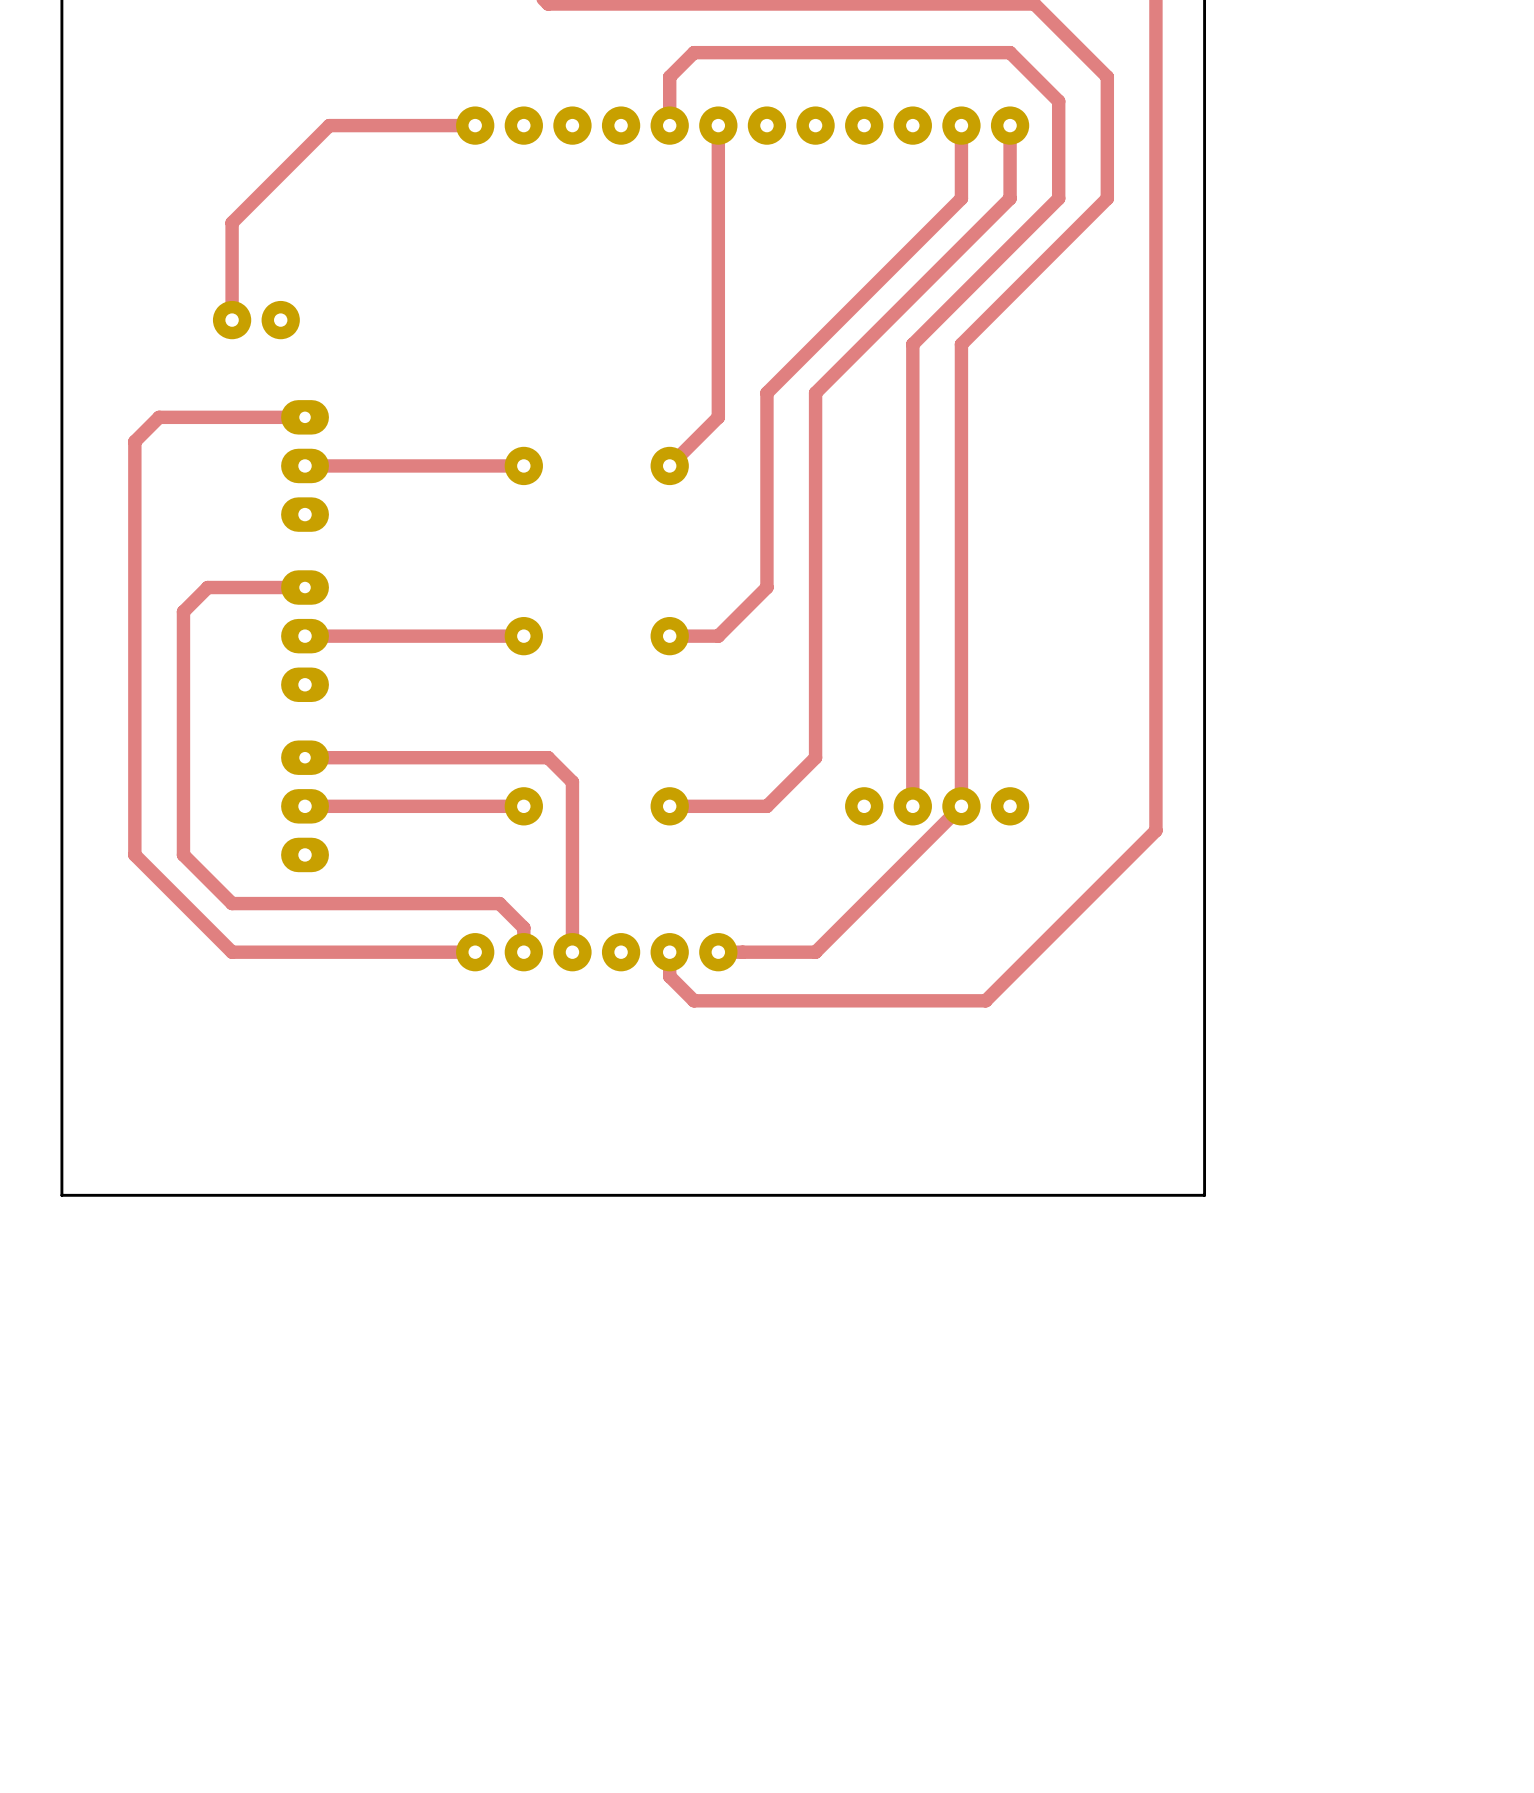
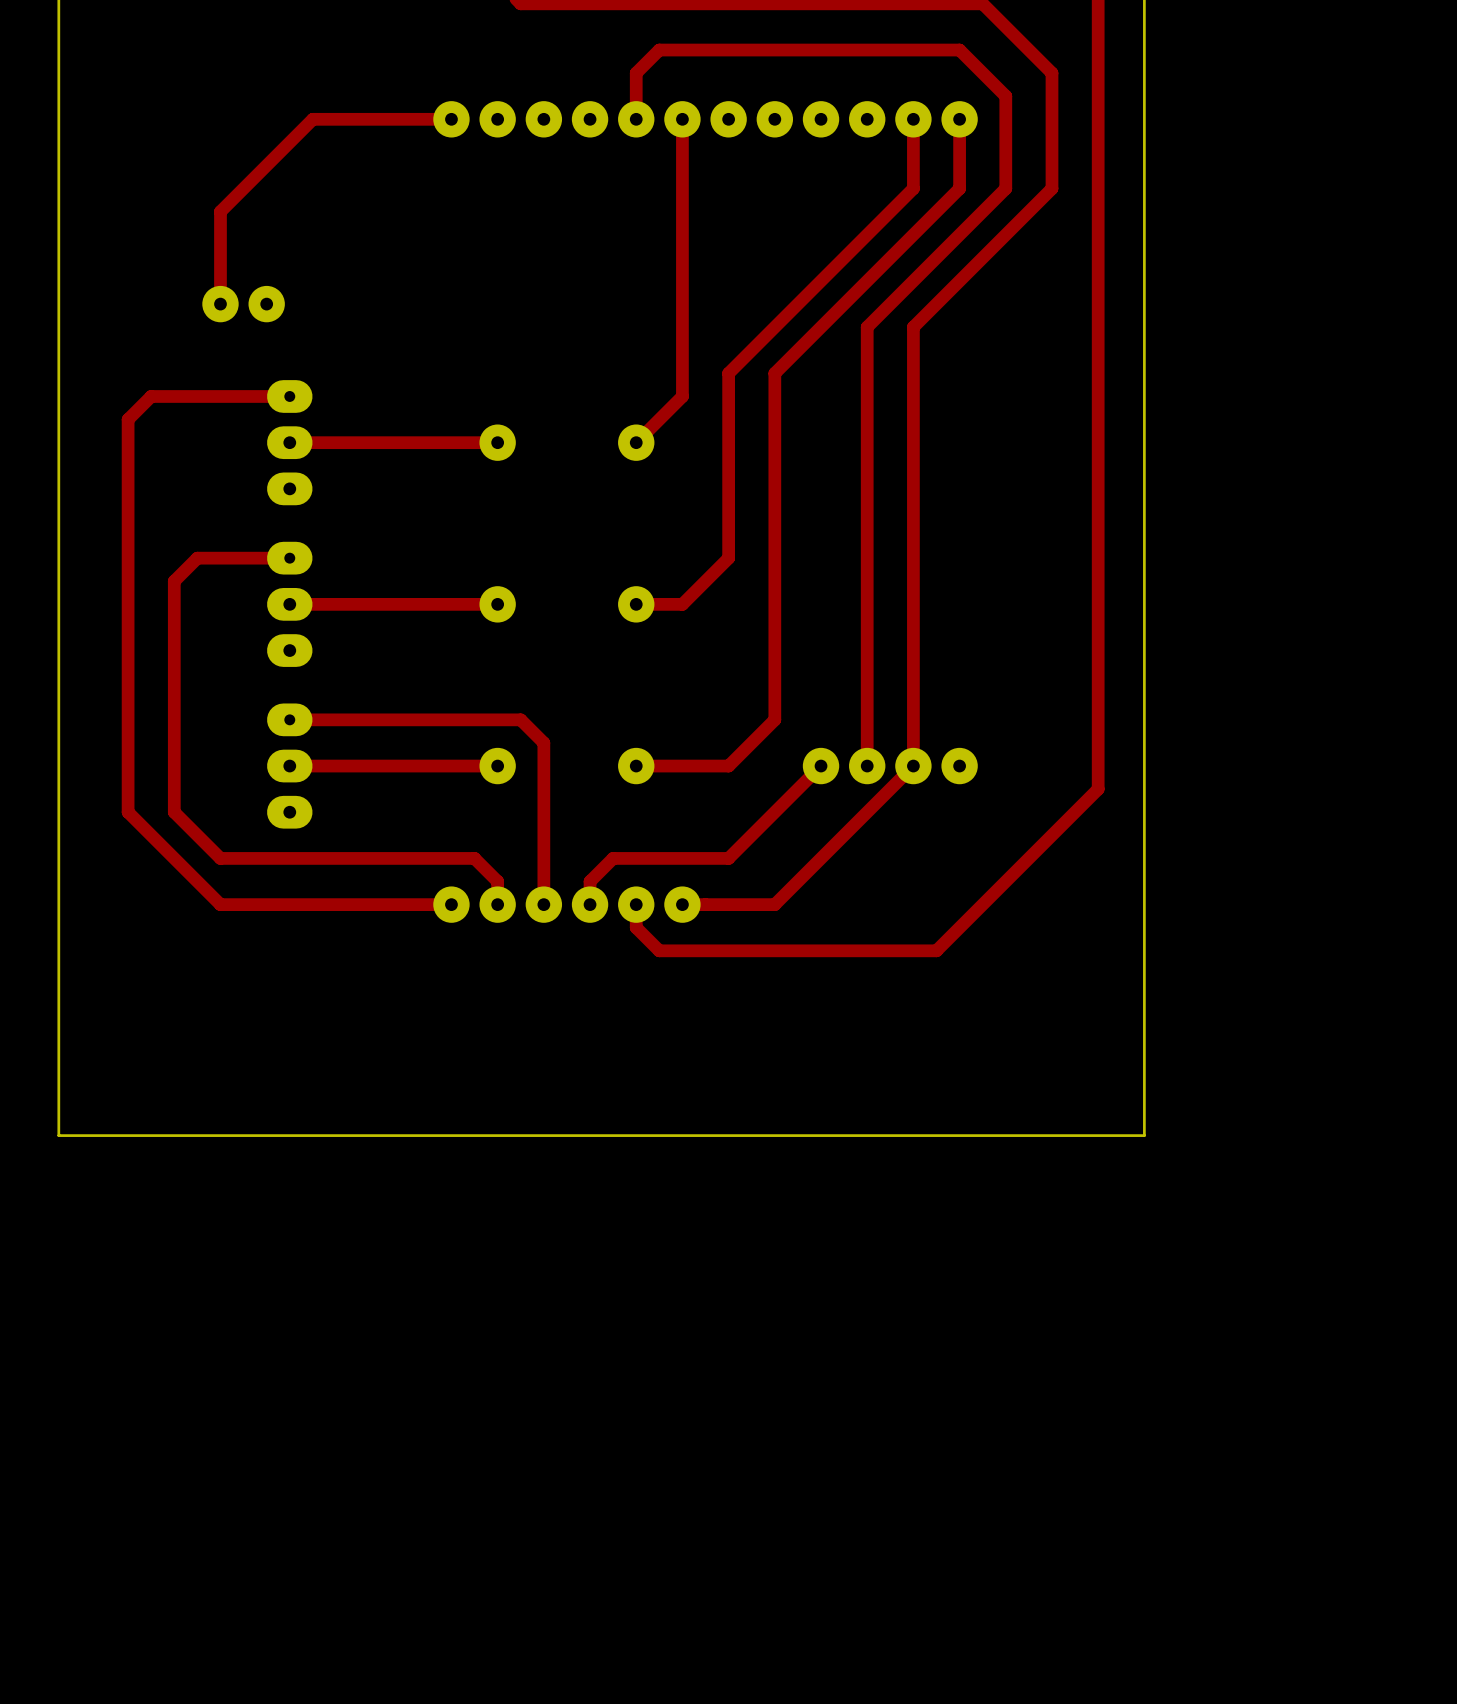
top track: none -> (821, 766) (728, 858) (613, 858) (590, 881) (590, 904)

